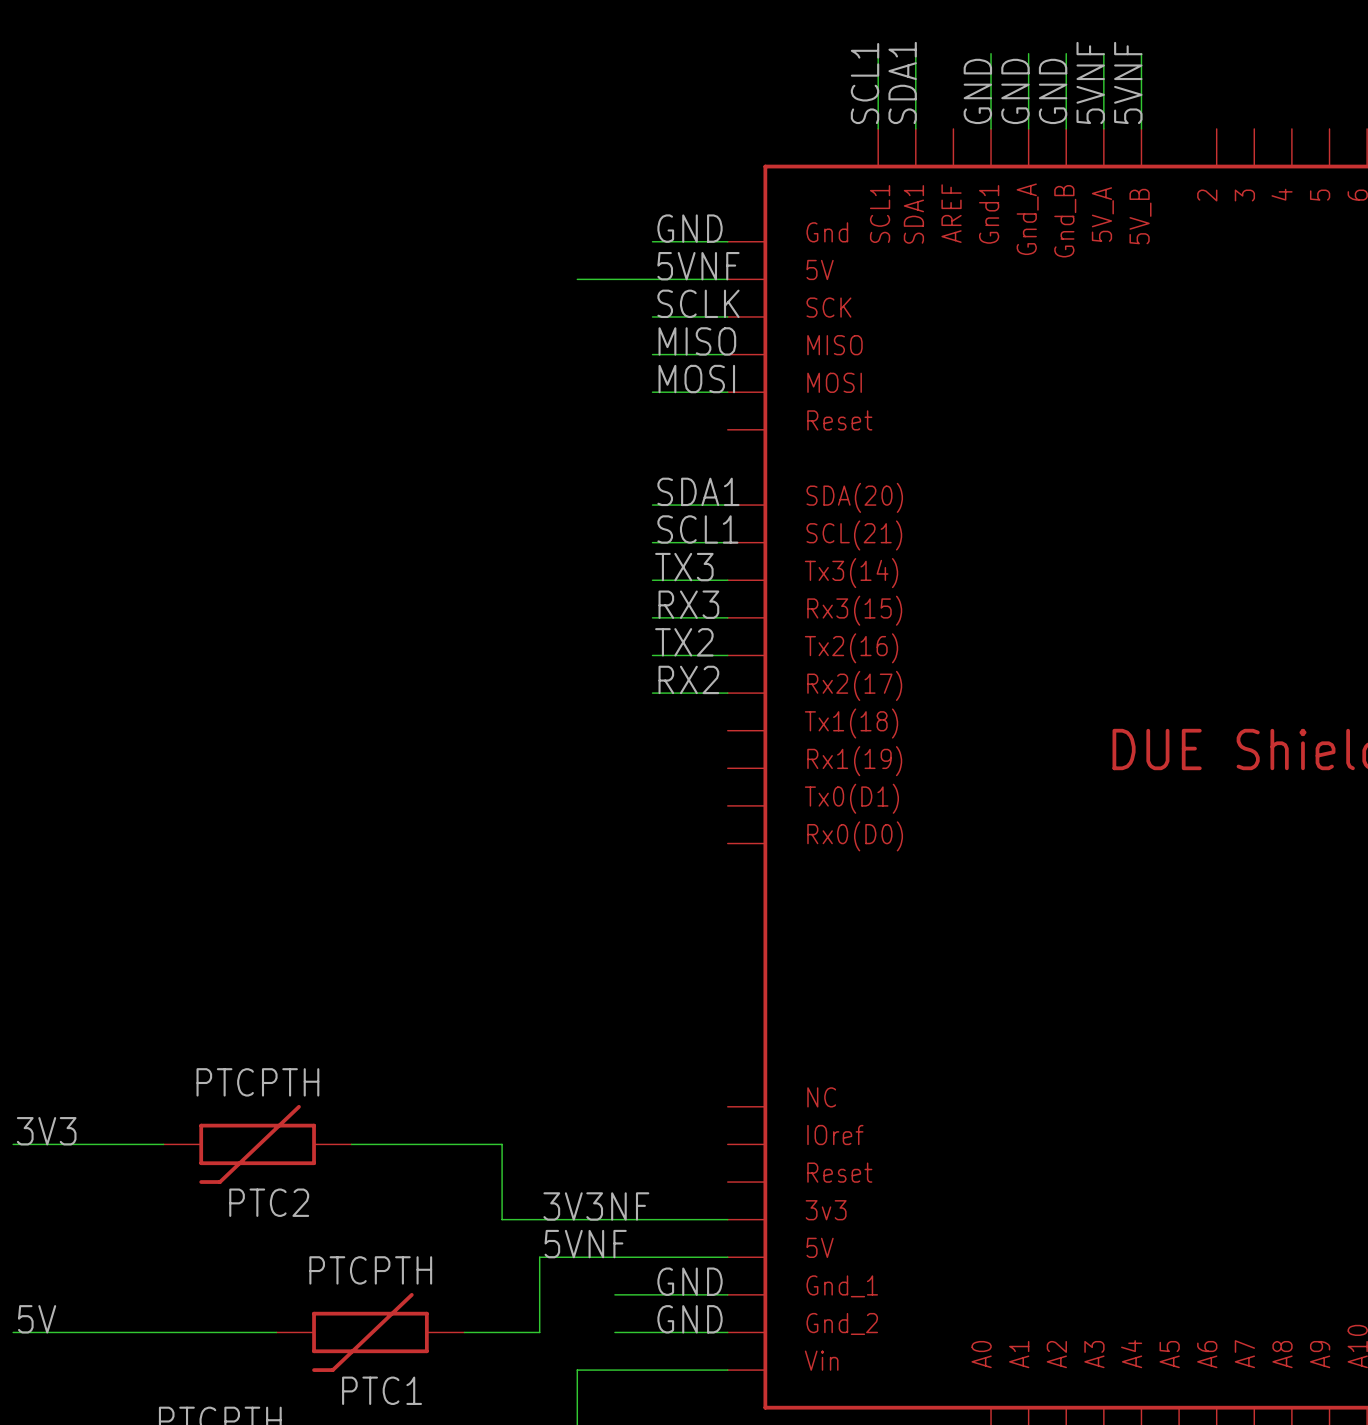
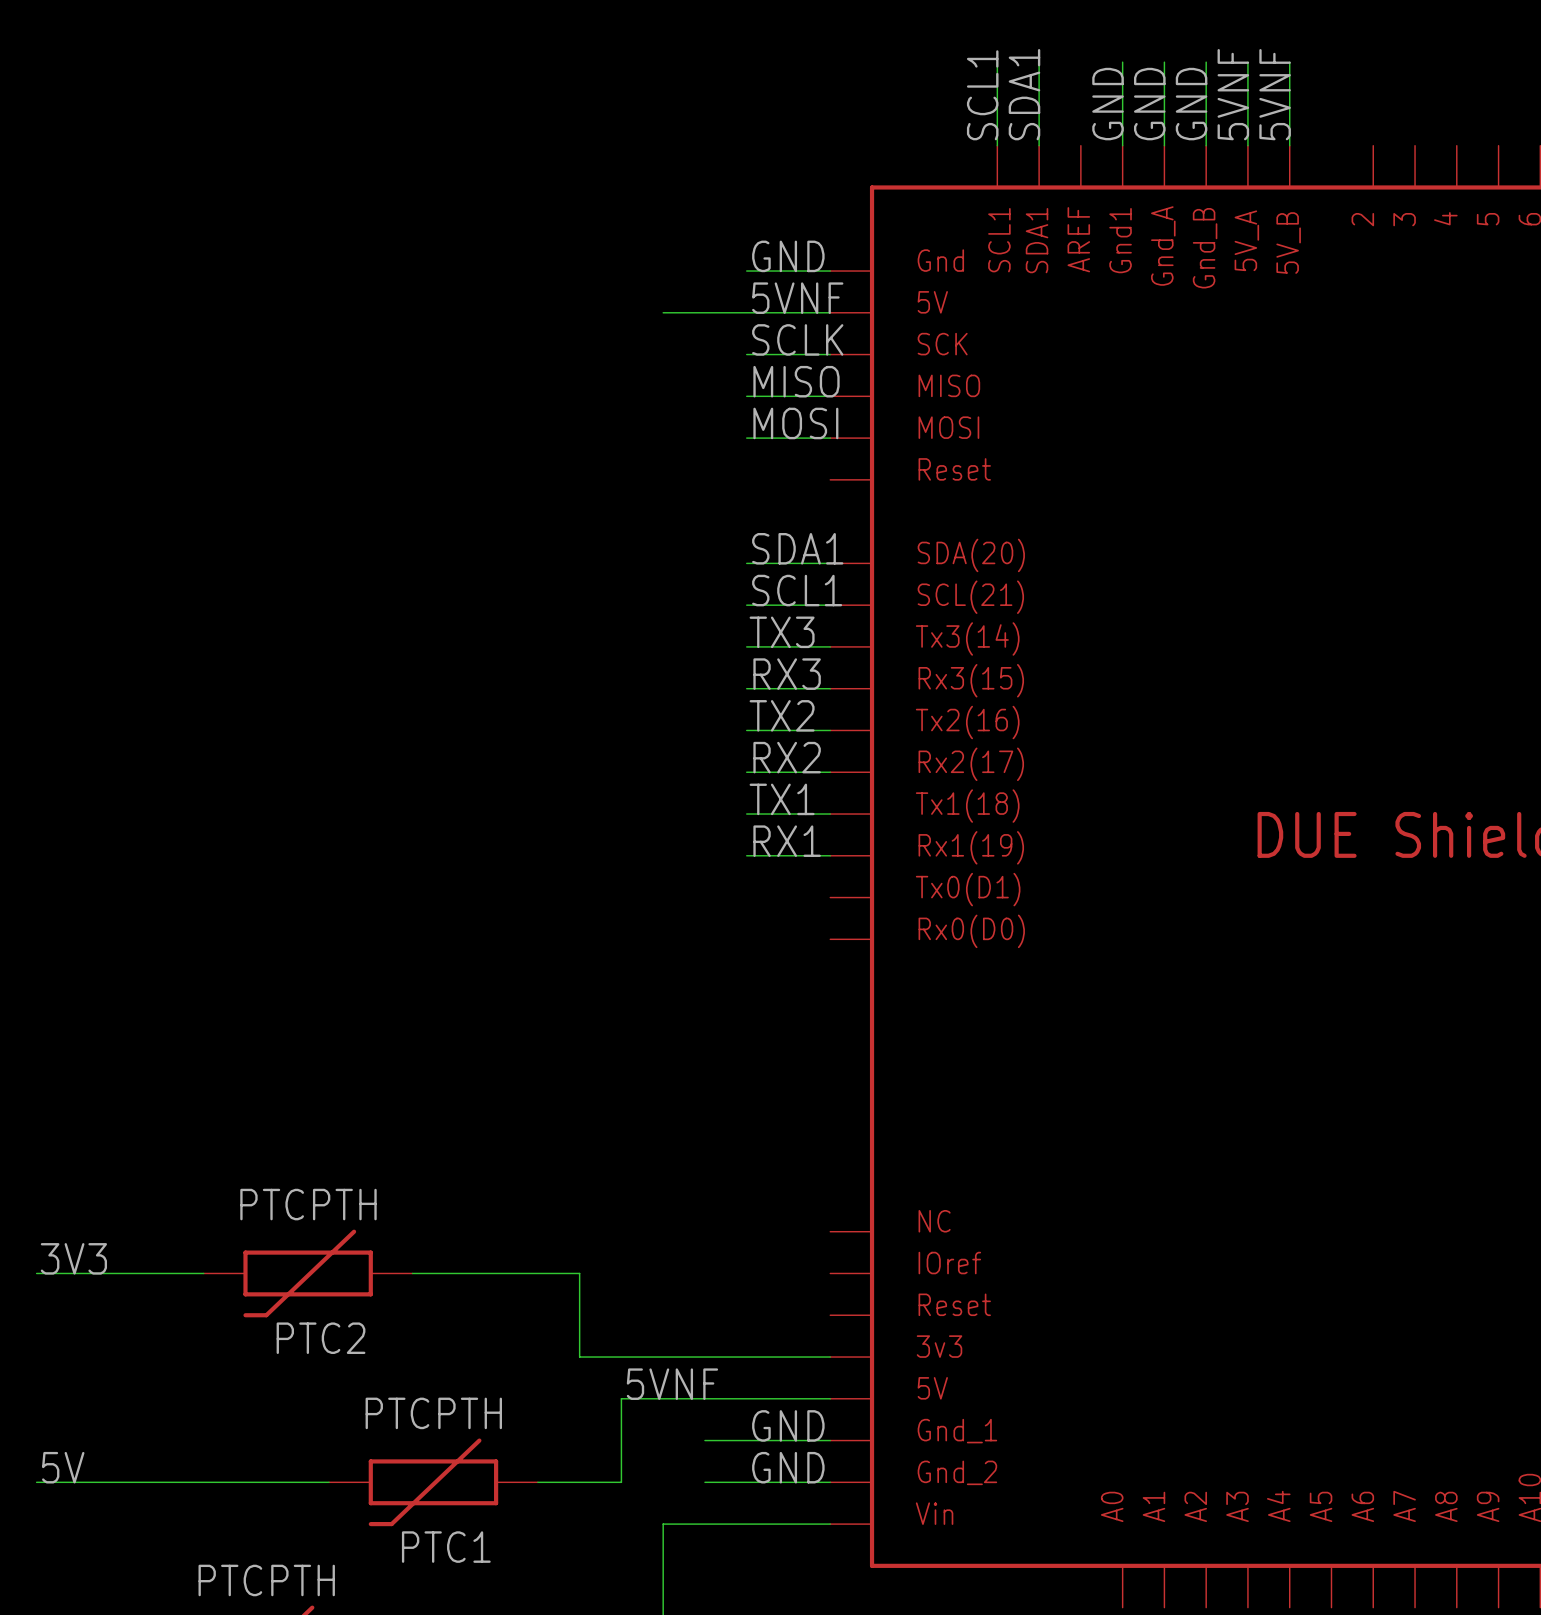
label: none -> TX1 (782, 799)
wire: none -> (746, 814) (830, 814)
label: none -> RX1 (787, 841)
wire: none -> (746, 855) (830, 855)
label: 3V3NF (596, 1206) -> none

